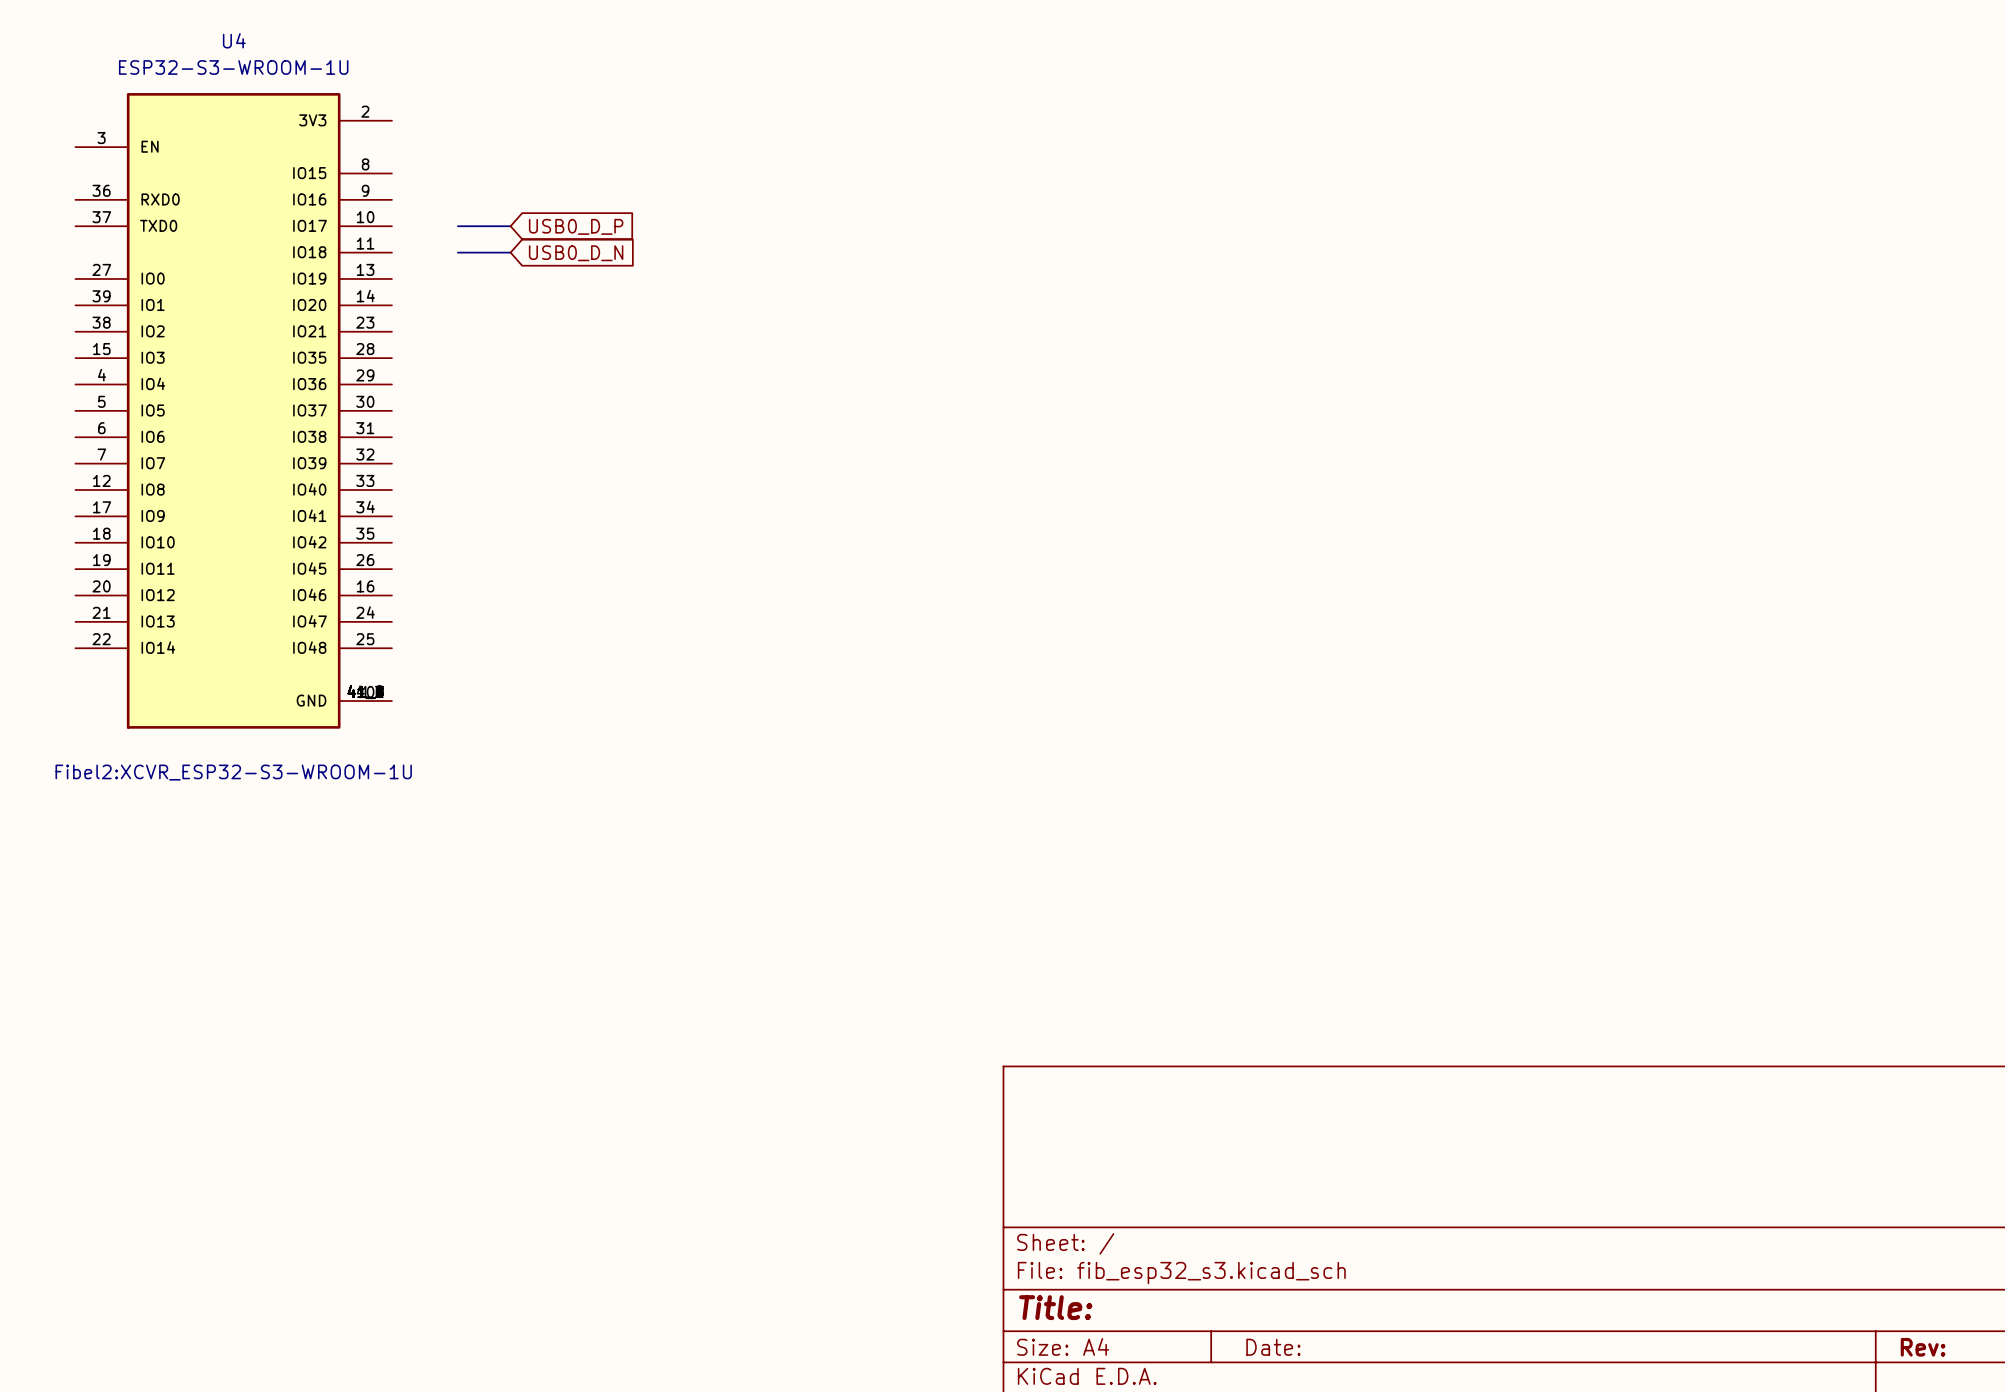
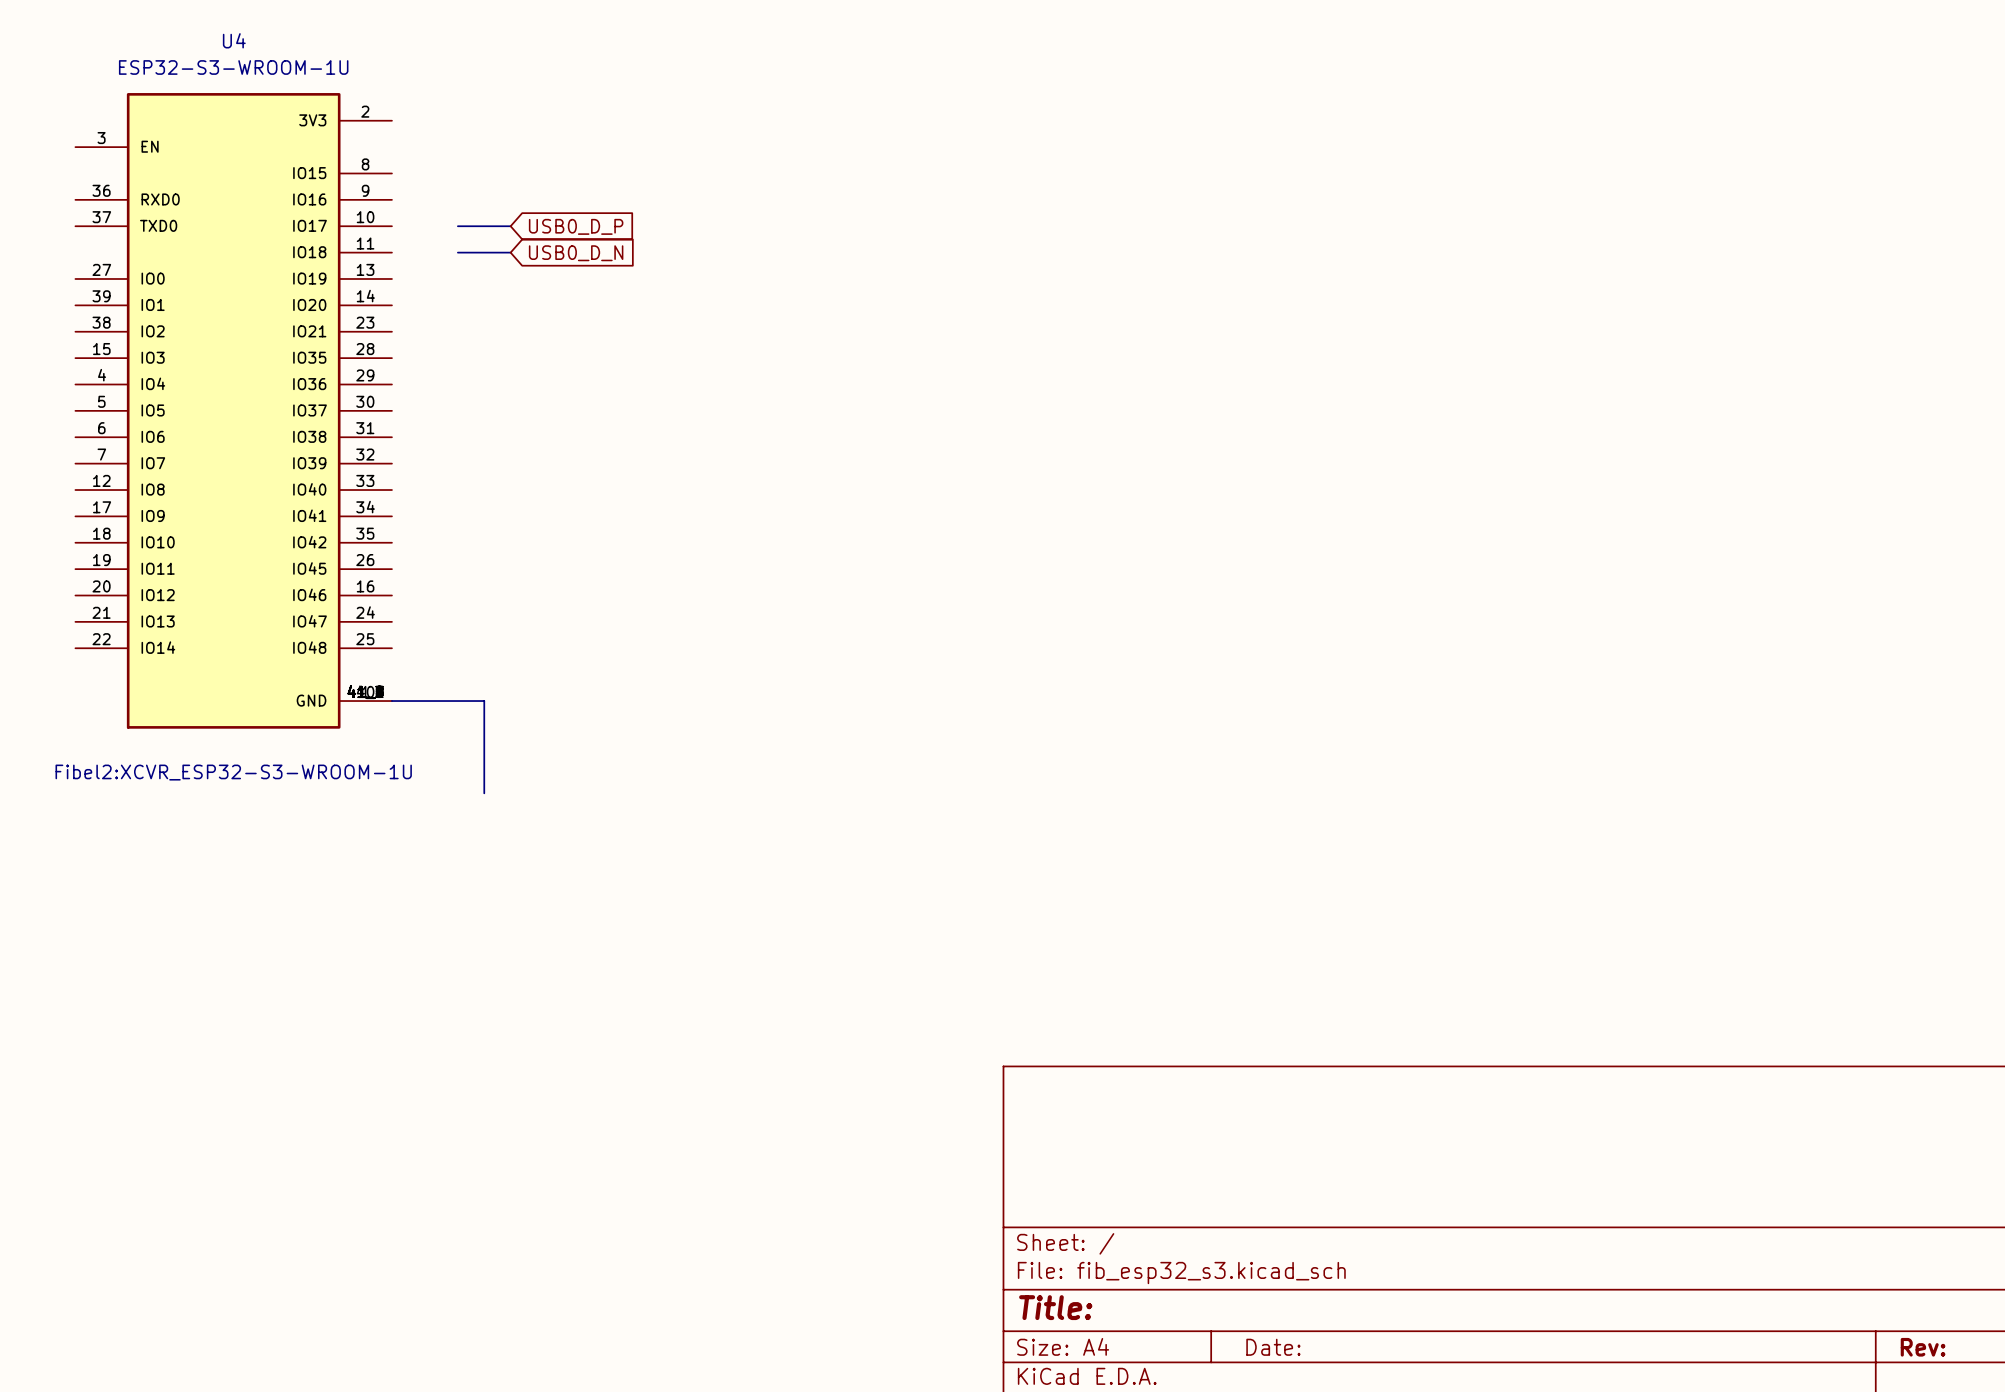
wire: none -> (391, 701) (484, 701) (484, 793)

